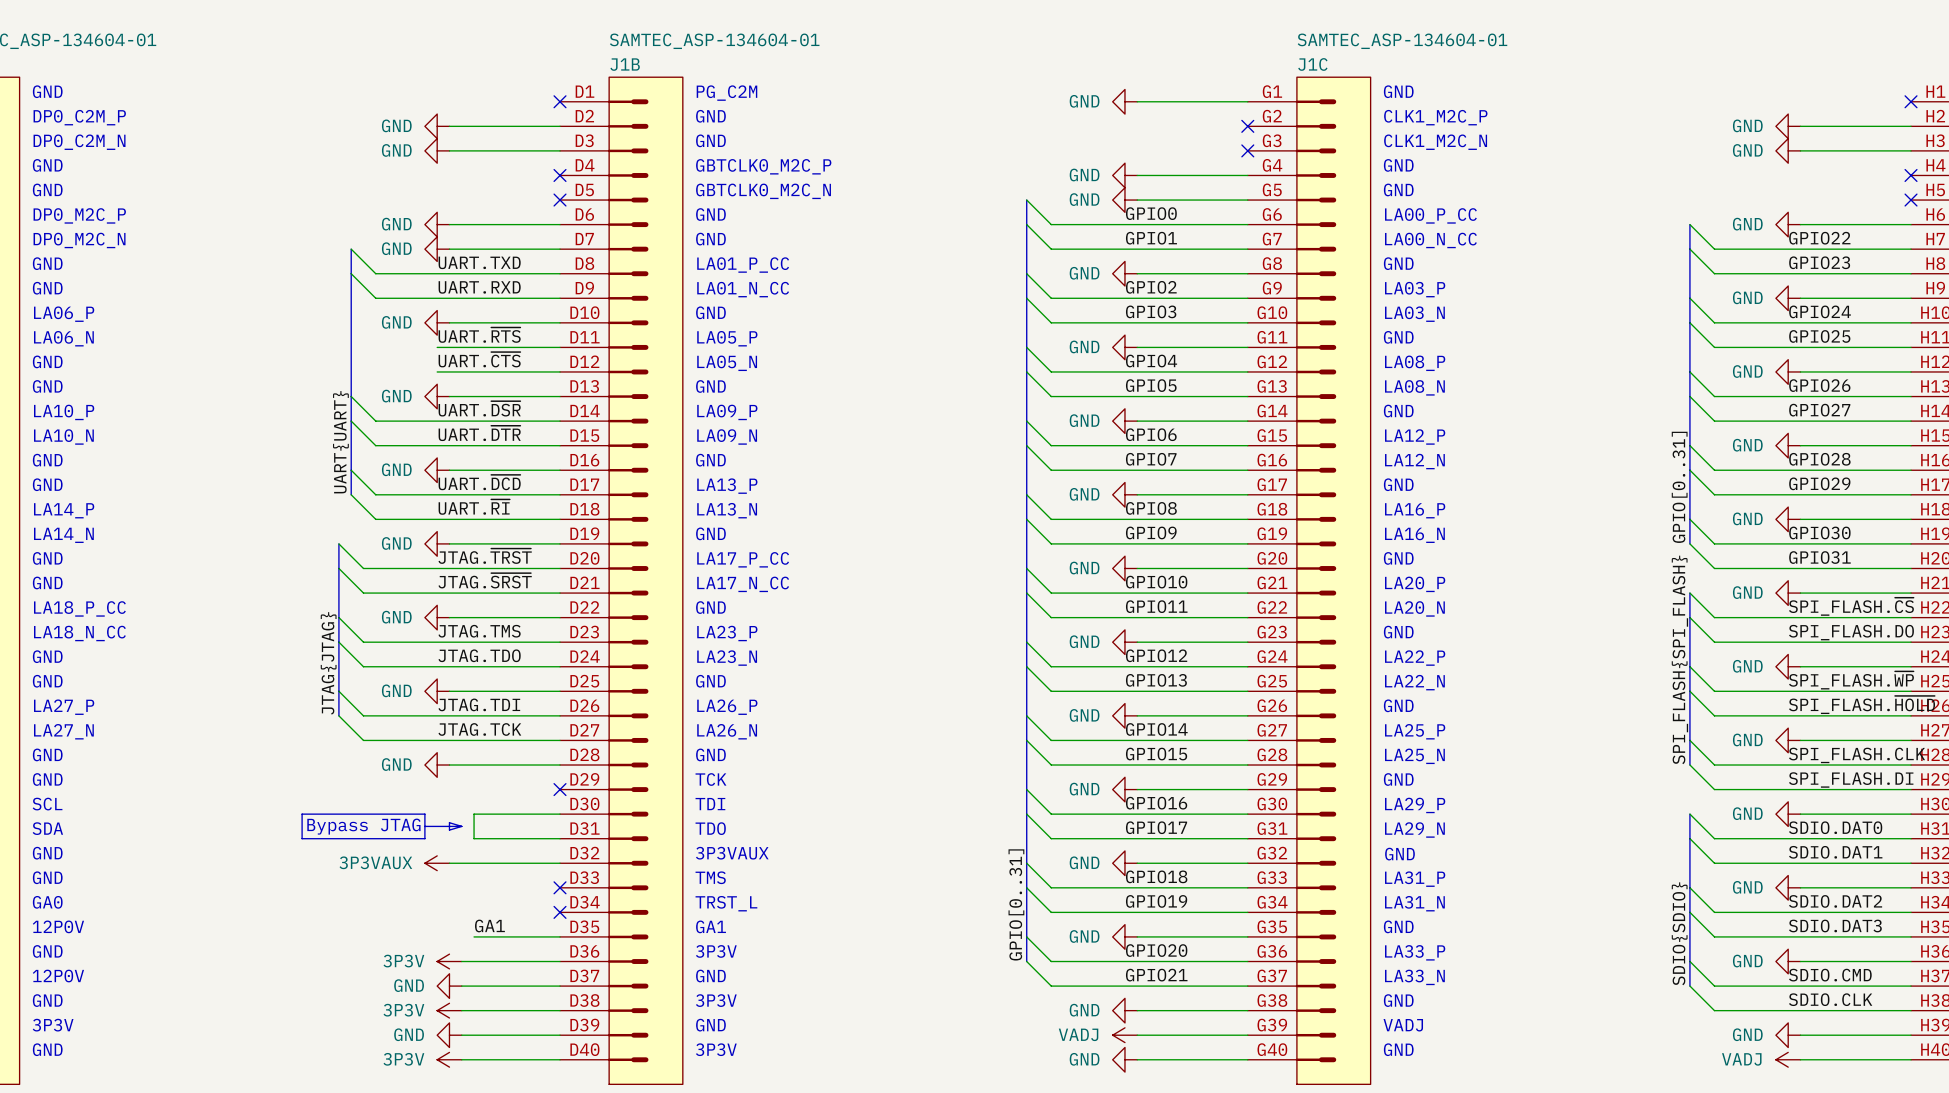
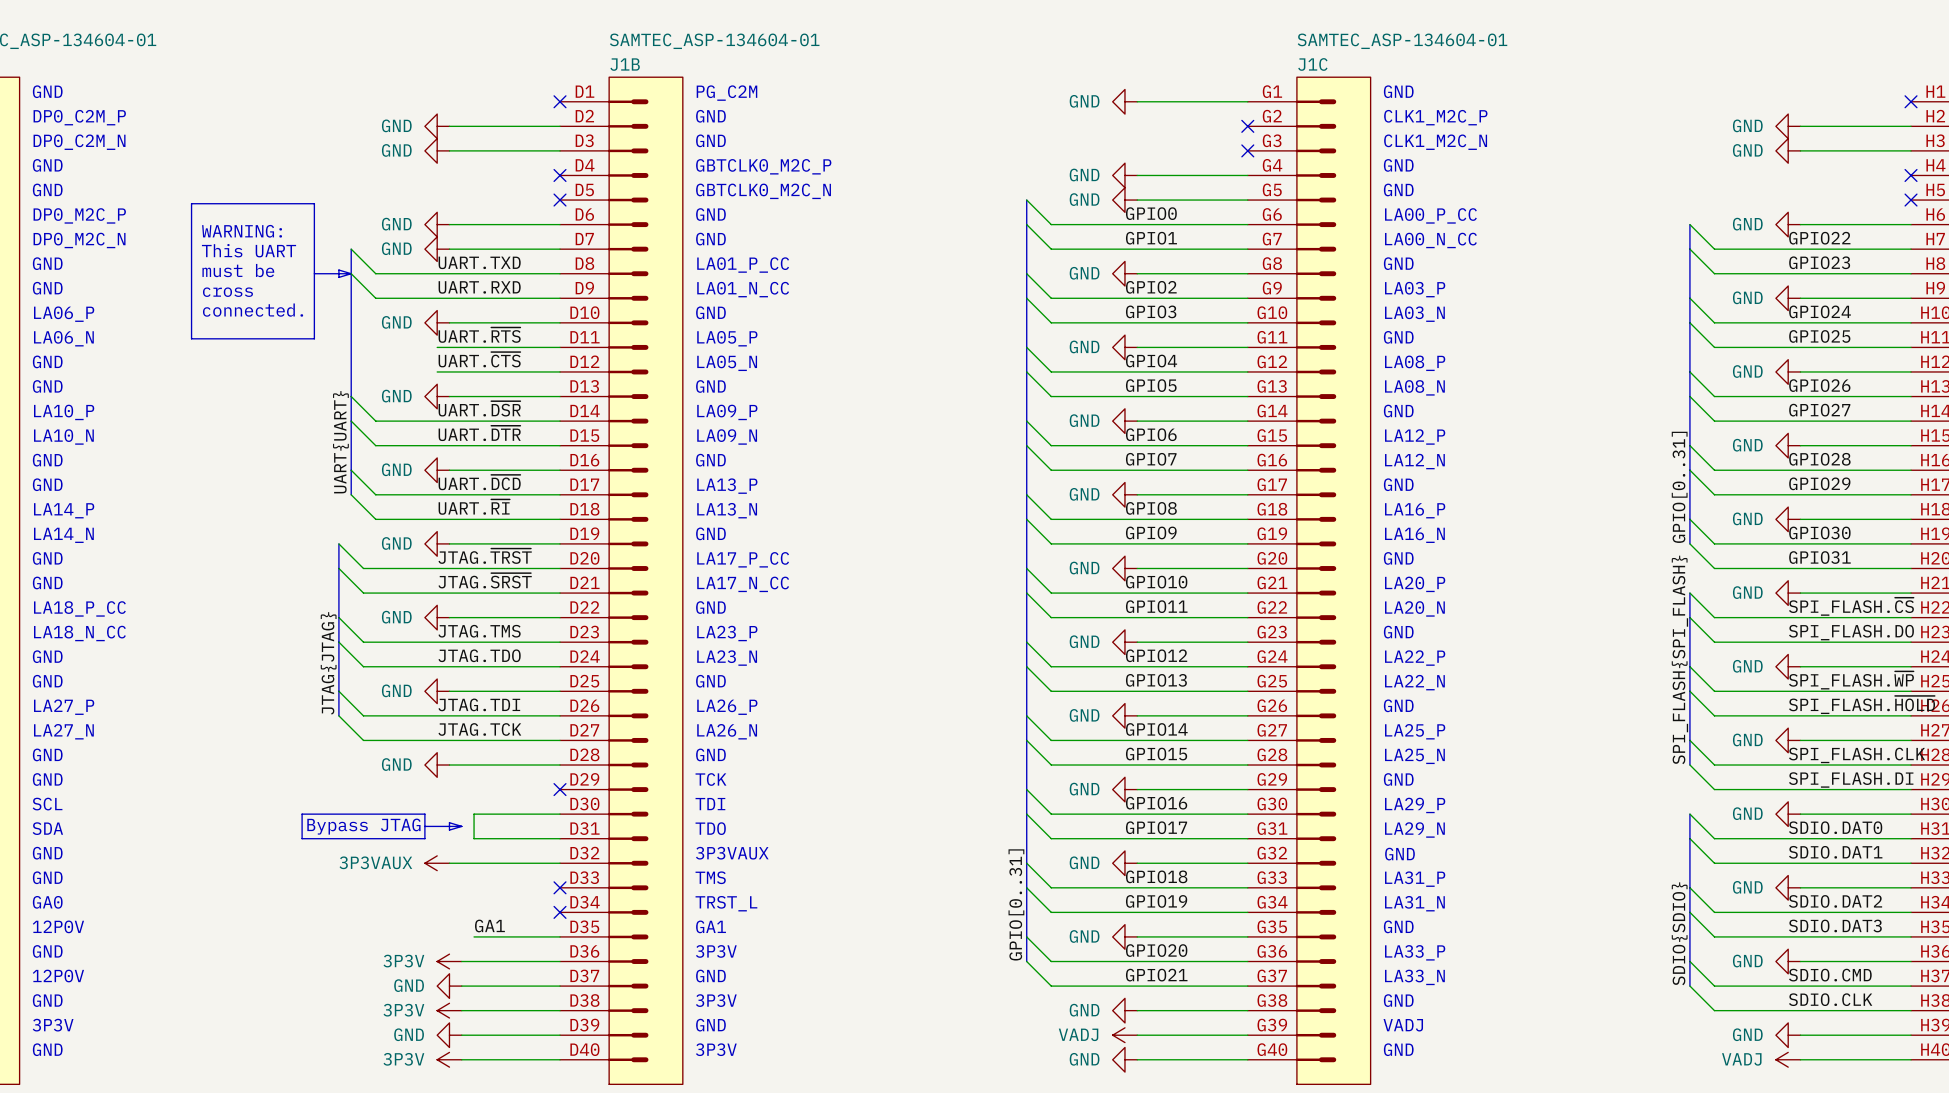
line: none -> (191, 203) (314, 203) (314, 338) (191, 338) (191, 203)
text: none -> WARNING: (242, 231)
text: none -> This UART (249, 250)
text: none -> must be (238, 270)
line: none -> (314, 273) (351, 273)
line: none -> (351, 273) (338, 277) (338, 270) (351, 273)
text: none -> cross (227, 292)
text: none -> connected. (253, 310)

